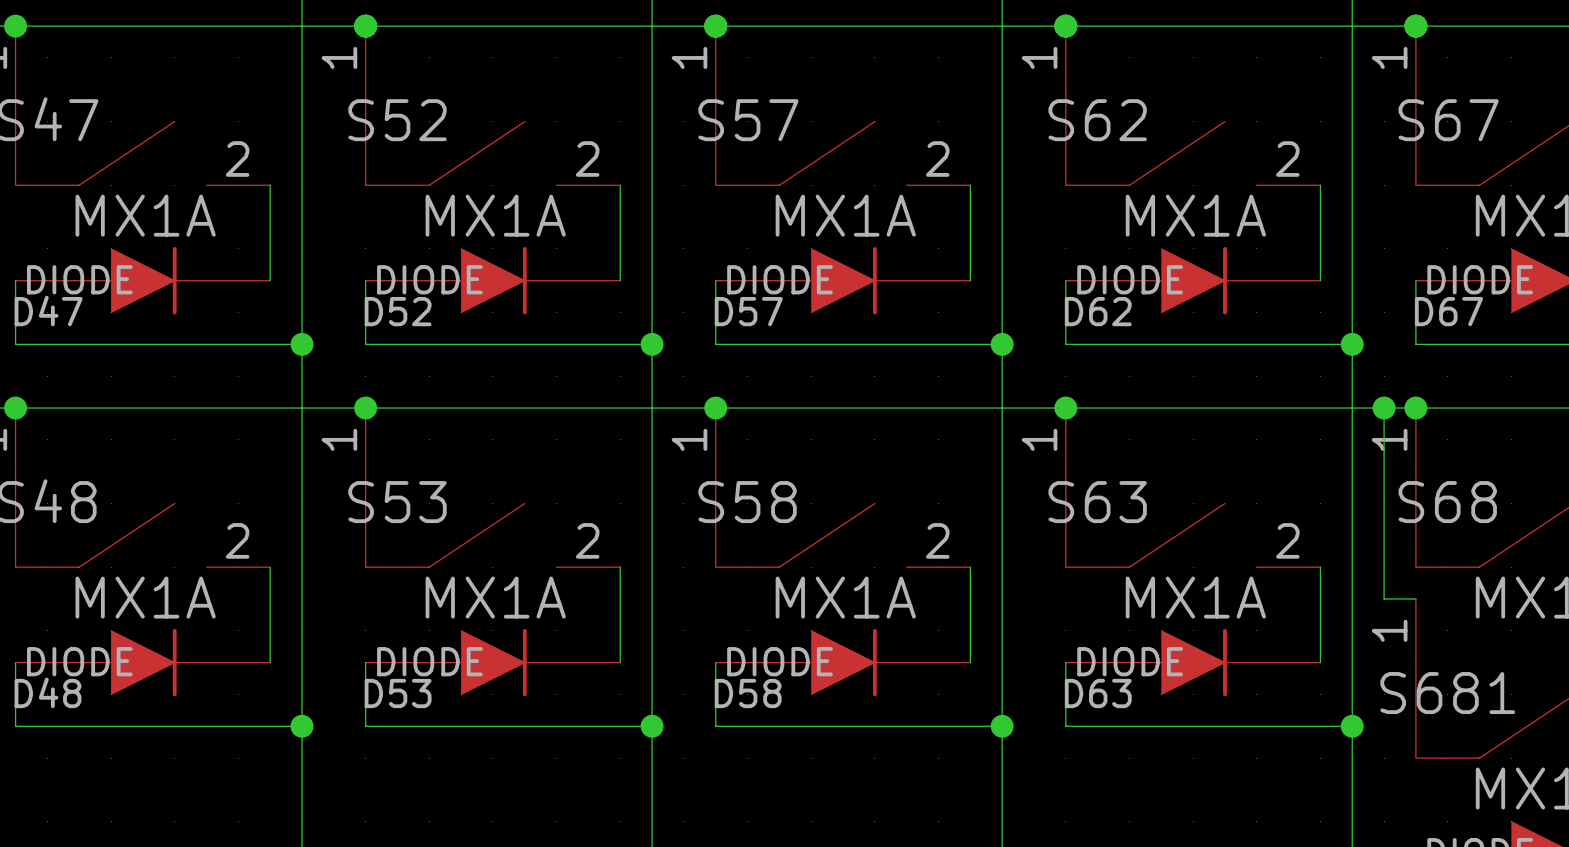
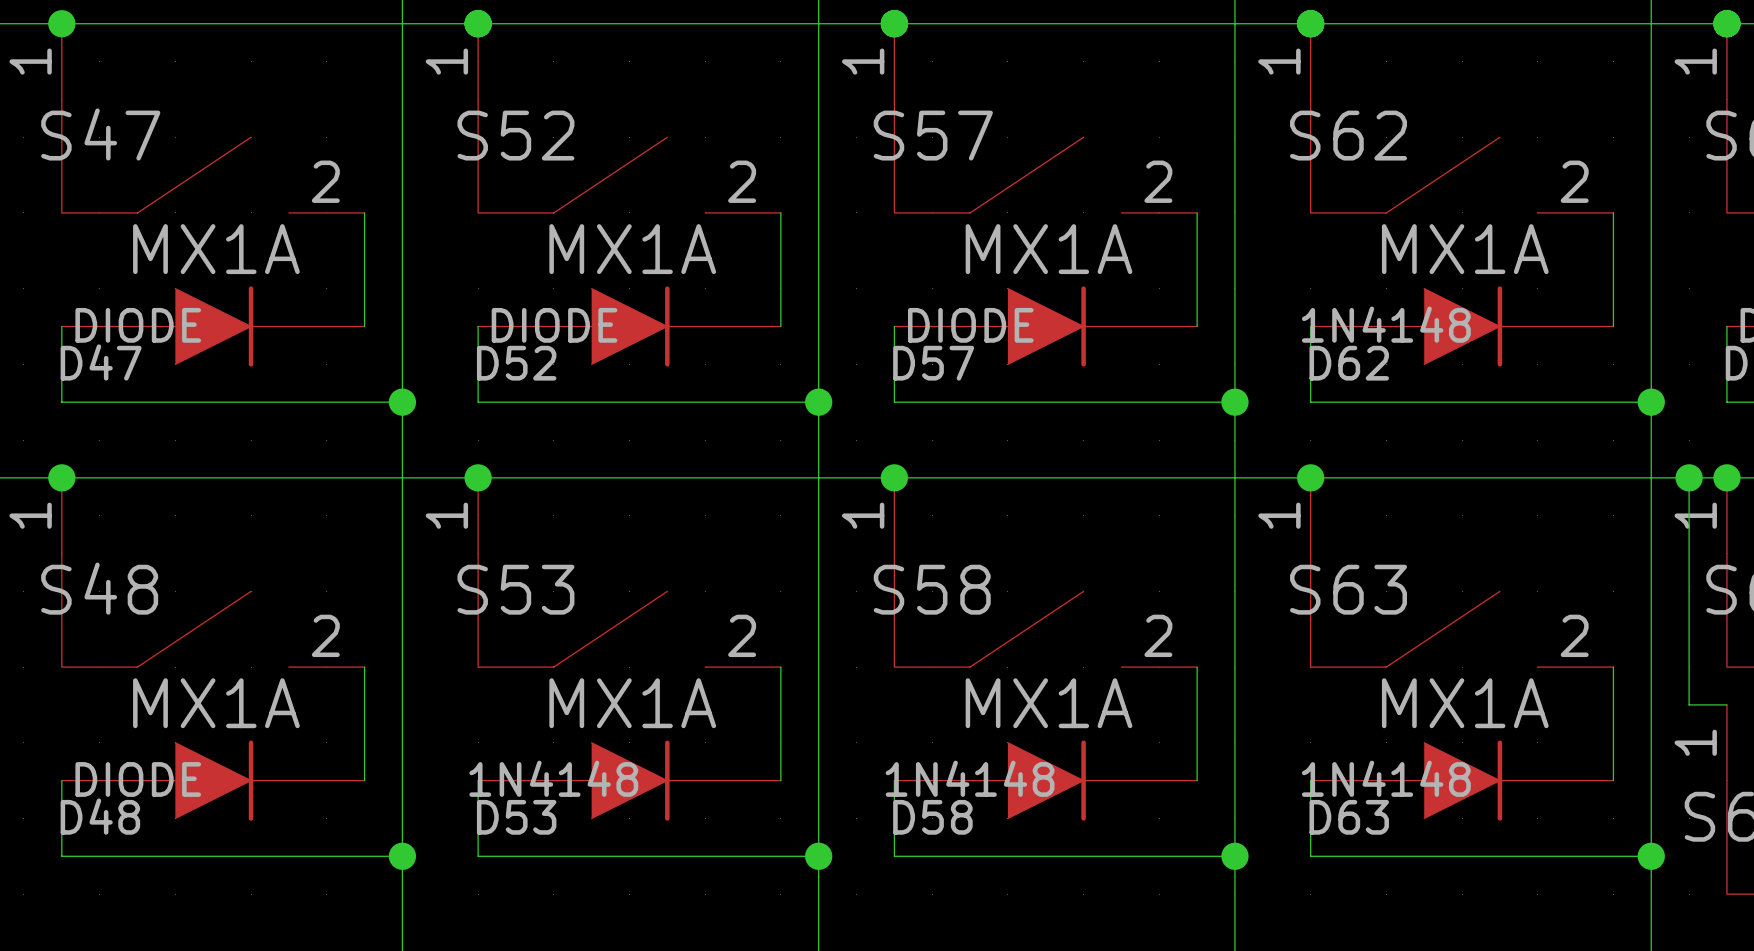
D62 value: DIODE (1130, 279) -> 1N4148 (1386, 324)
D53 value: DIODE (429, 661) -> 1N4148 (553, 778)
D58 value: DIODE (780, 661) -> 1N4148 (970, 778)
D63 value: DIODE (1130, 661) -> 1N4148 (1386, 778)

